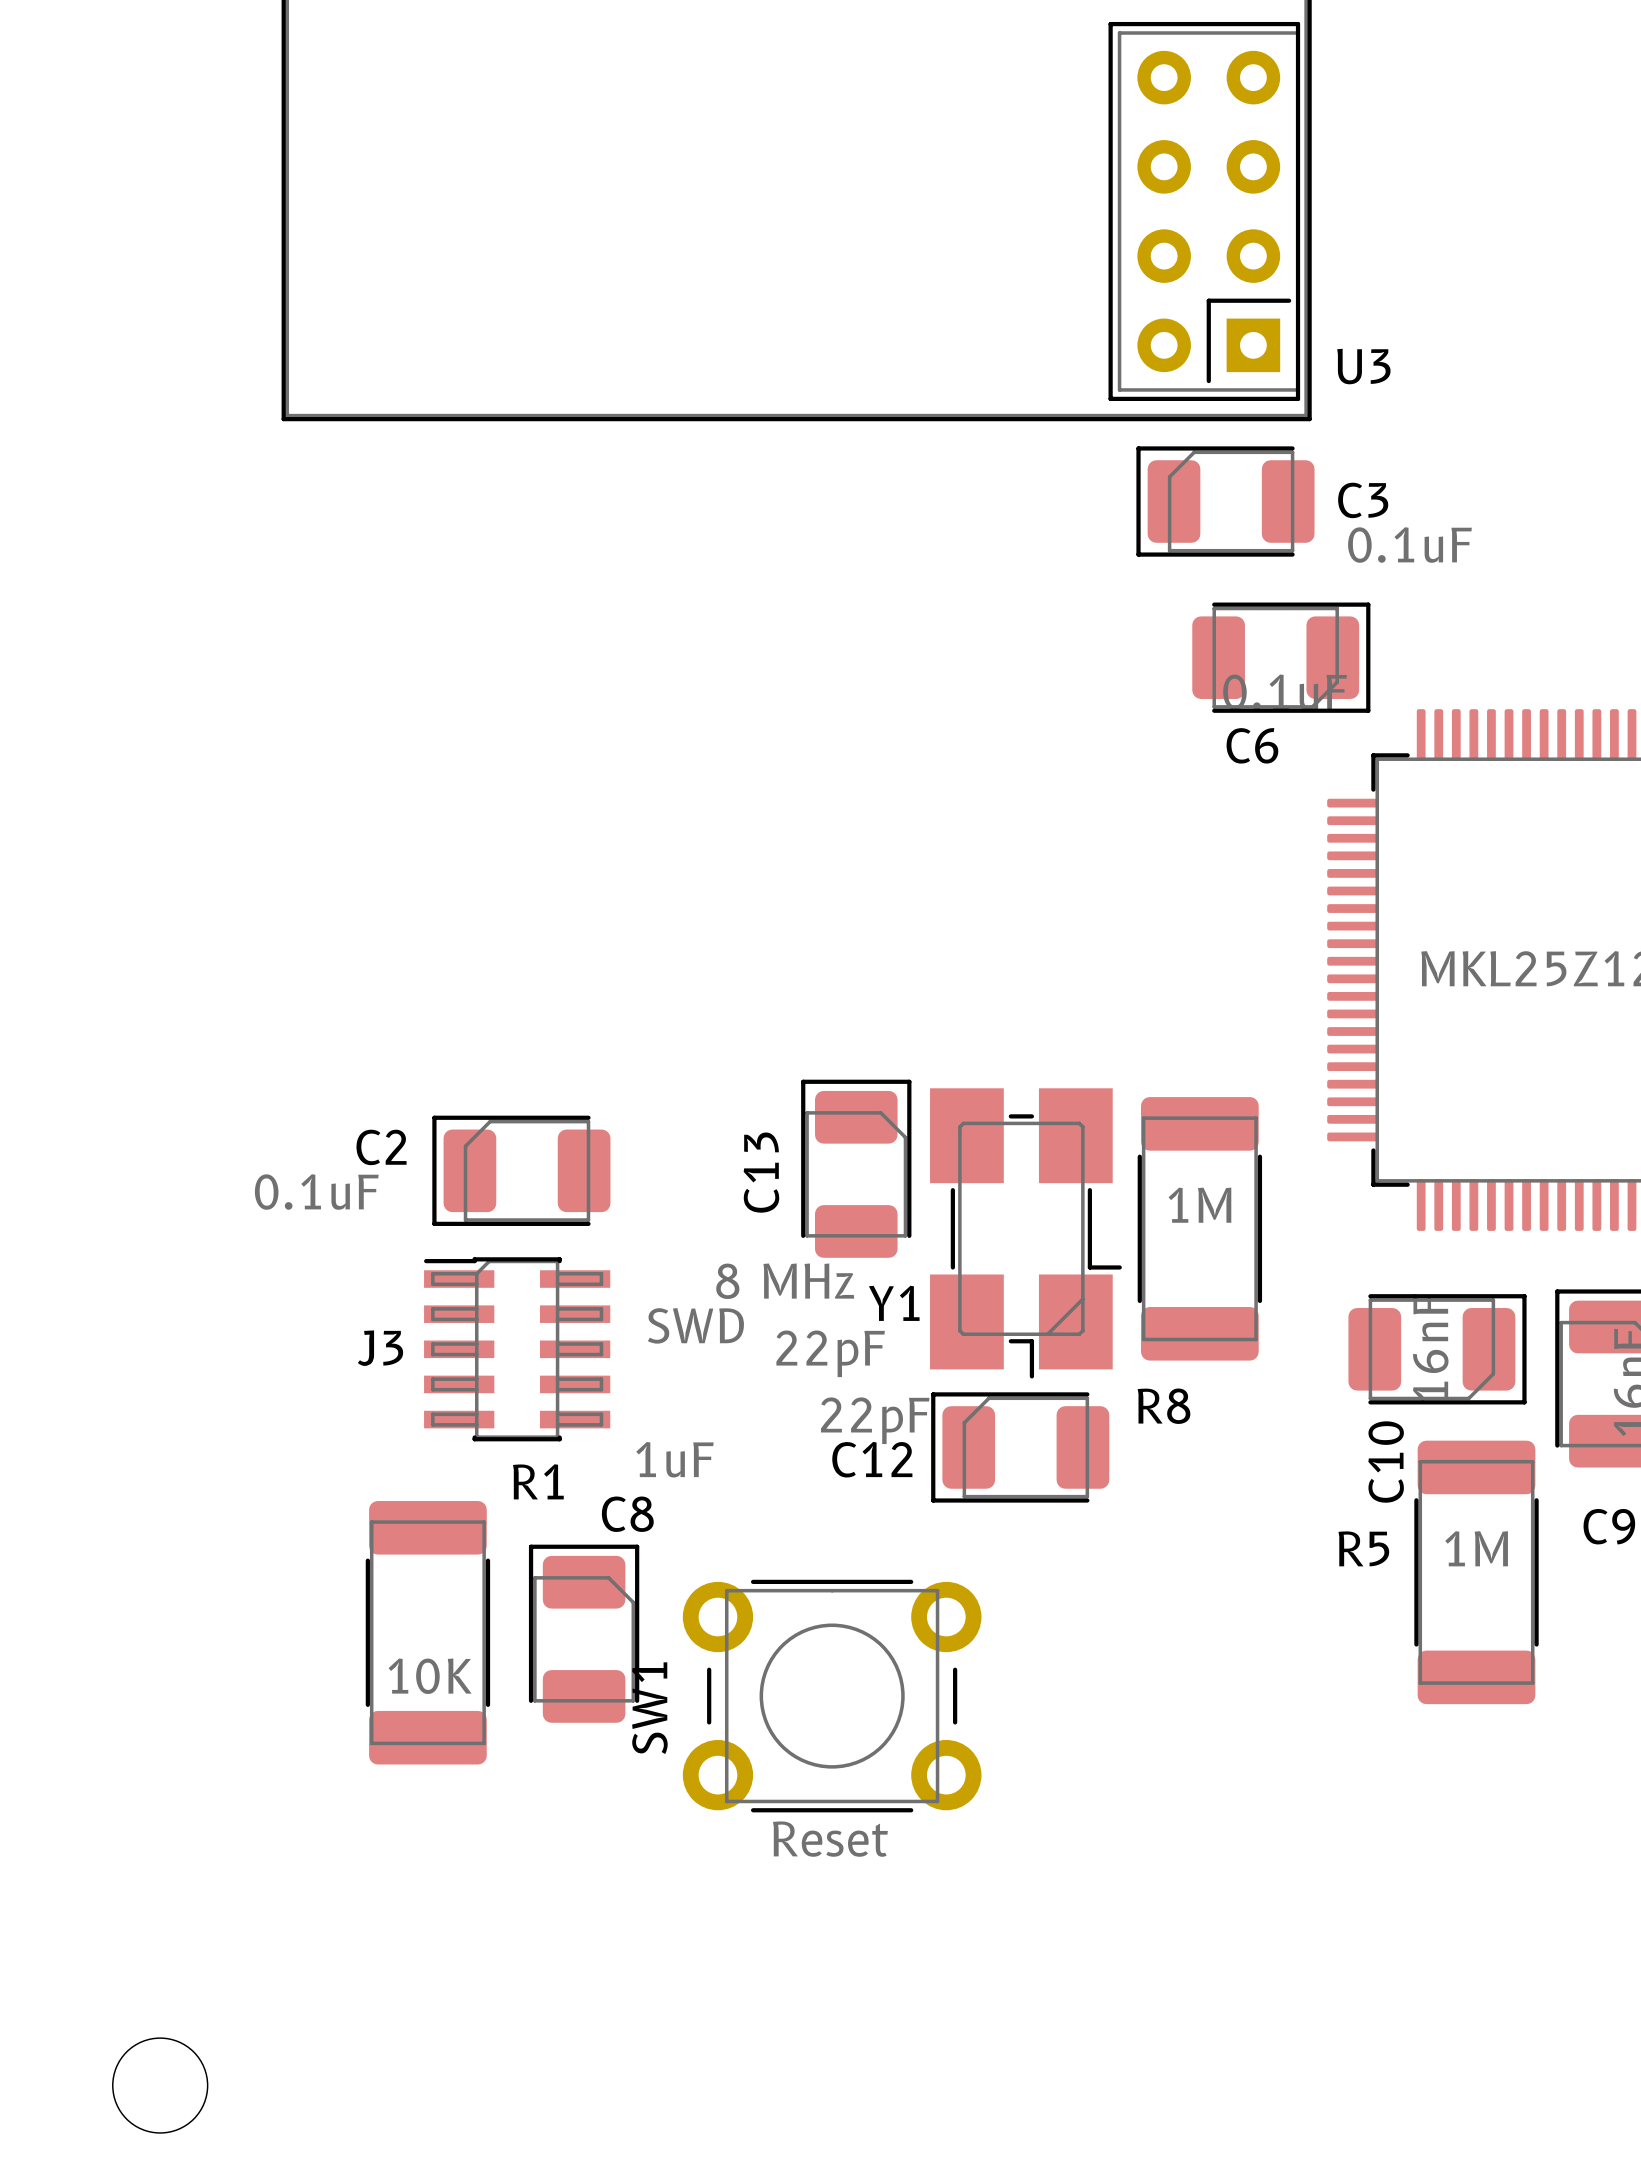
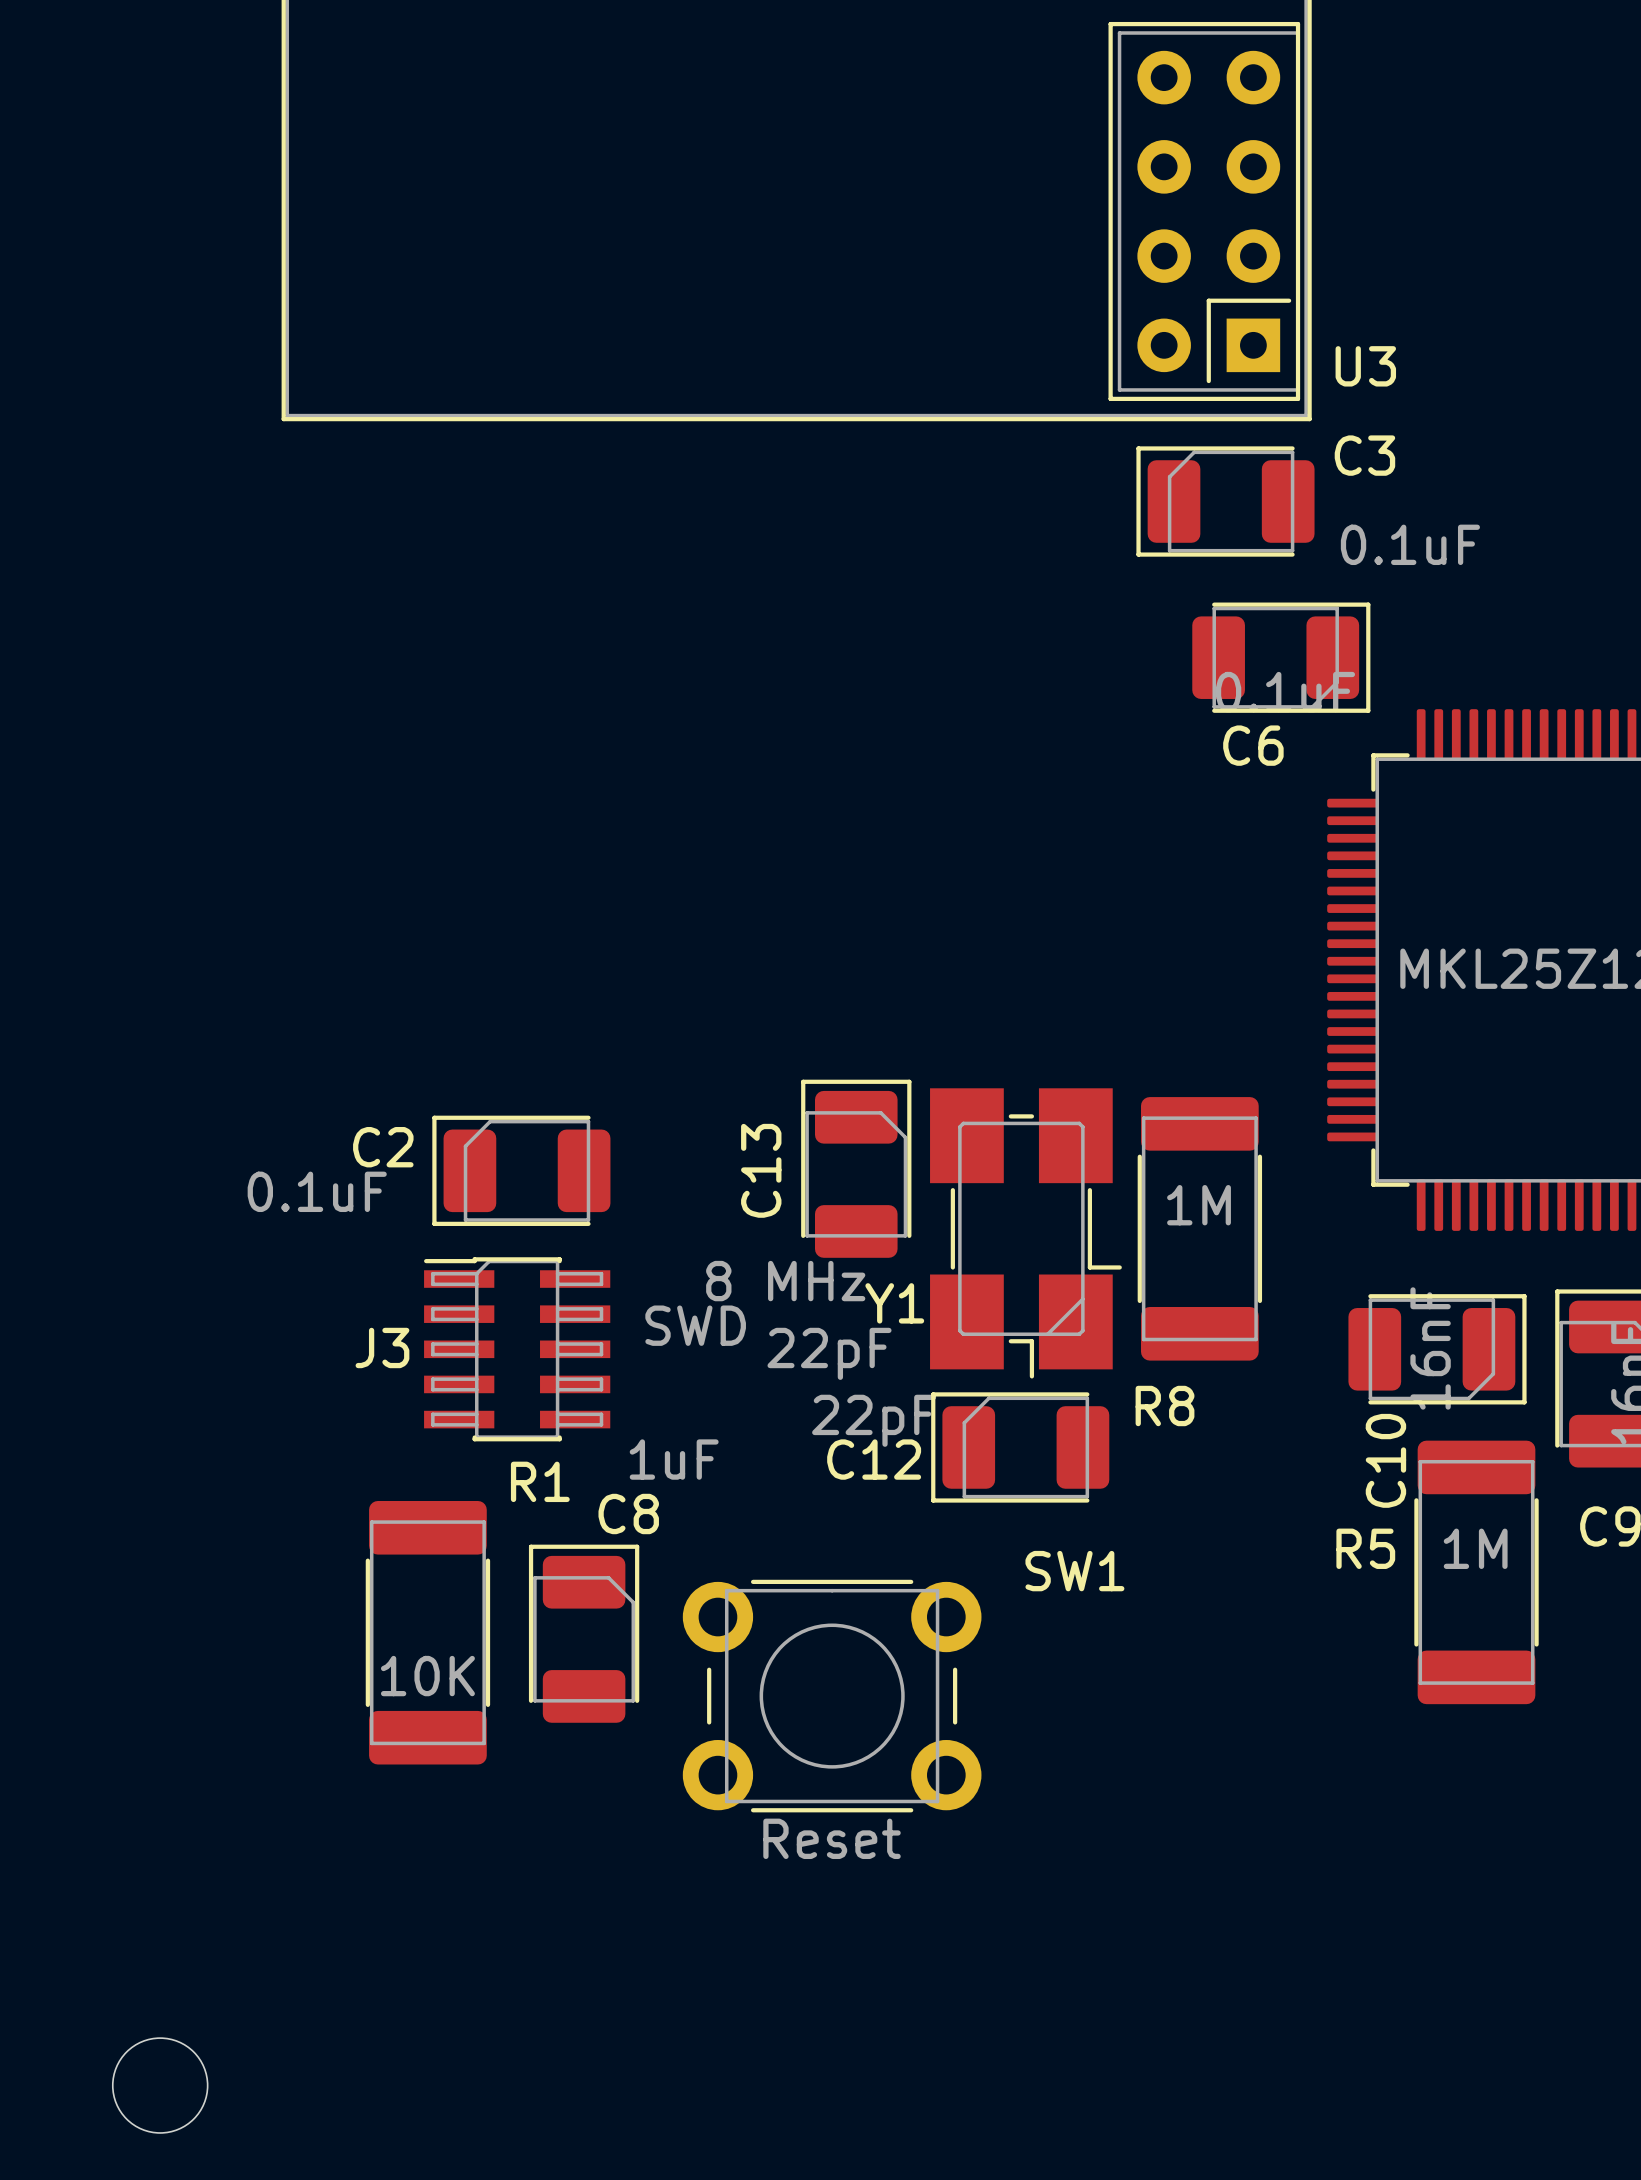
C3 name position: C3 (1363, 500) -> C3 (1364, 455)
SW1 name rotation: 0° (649, 1708) -> 90° clockwise (1074, 1571)
SW1 name position: SW1 (649, 1708) -> SW1 (1074, 1571)

